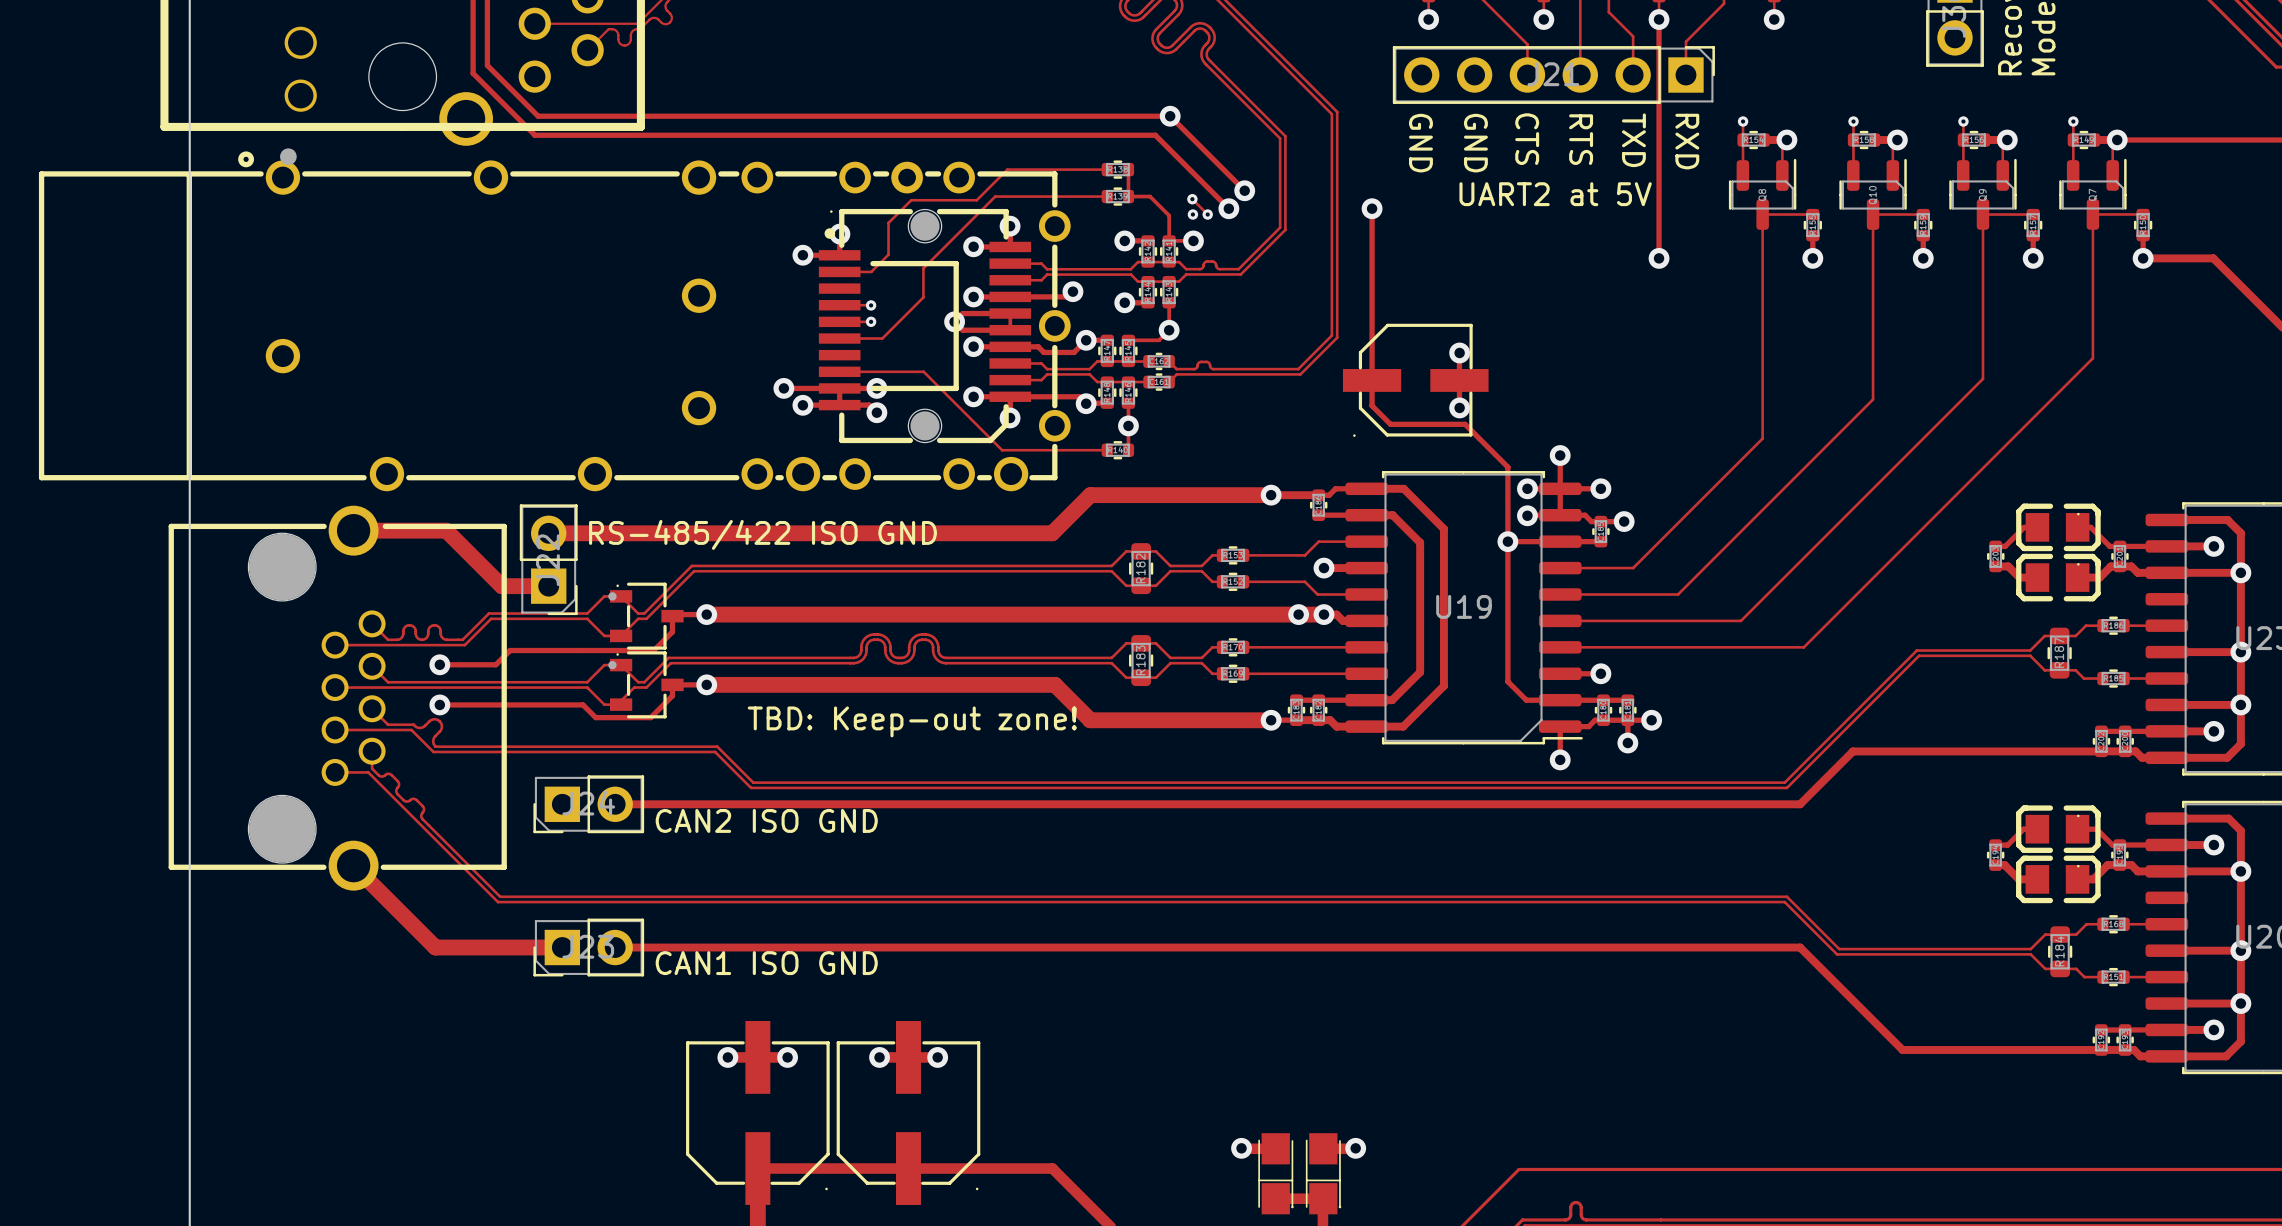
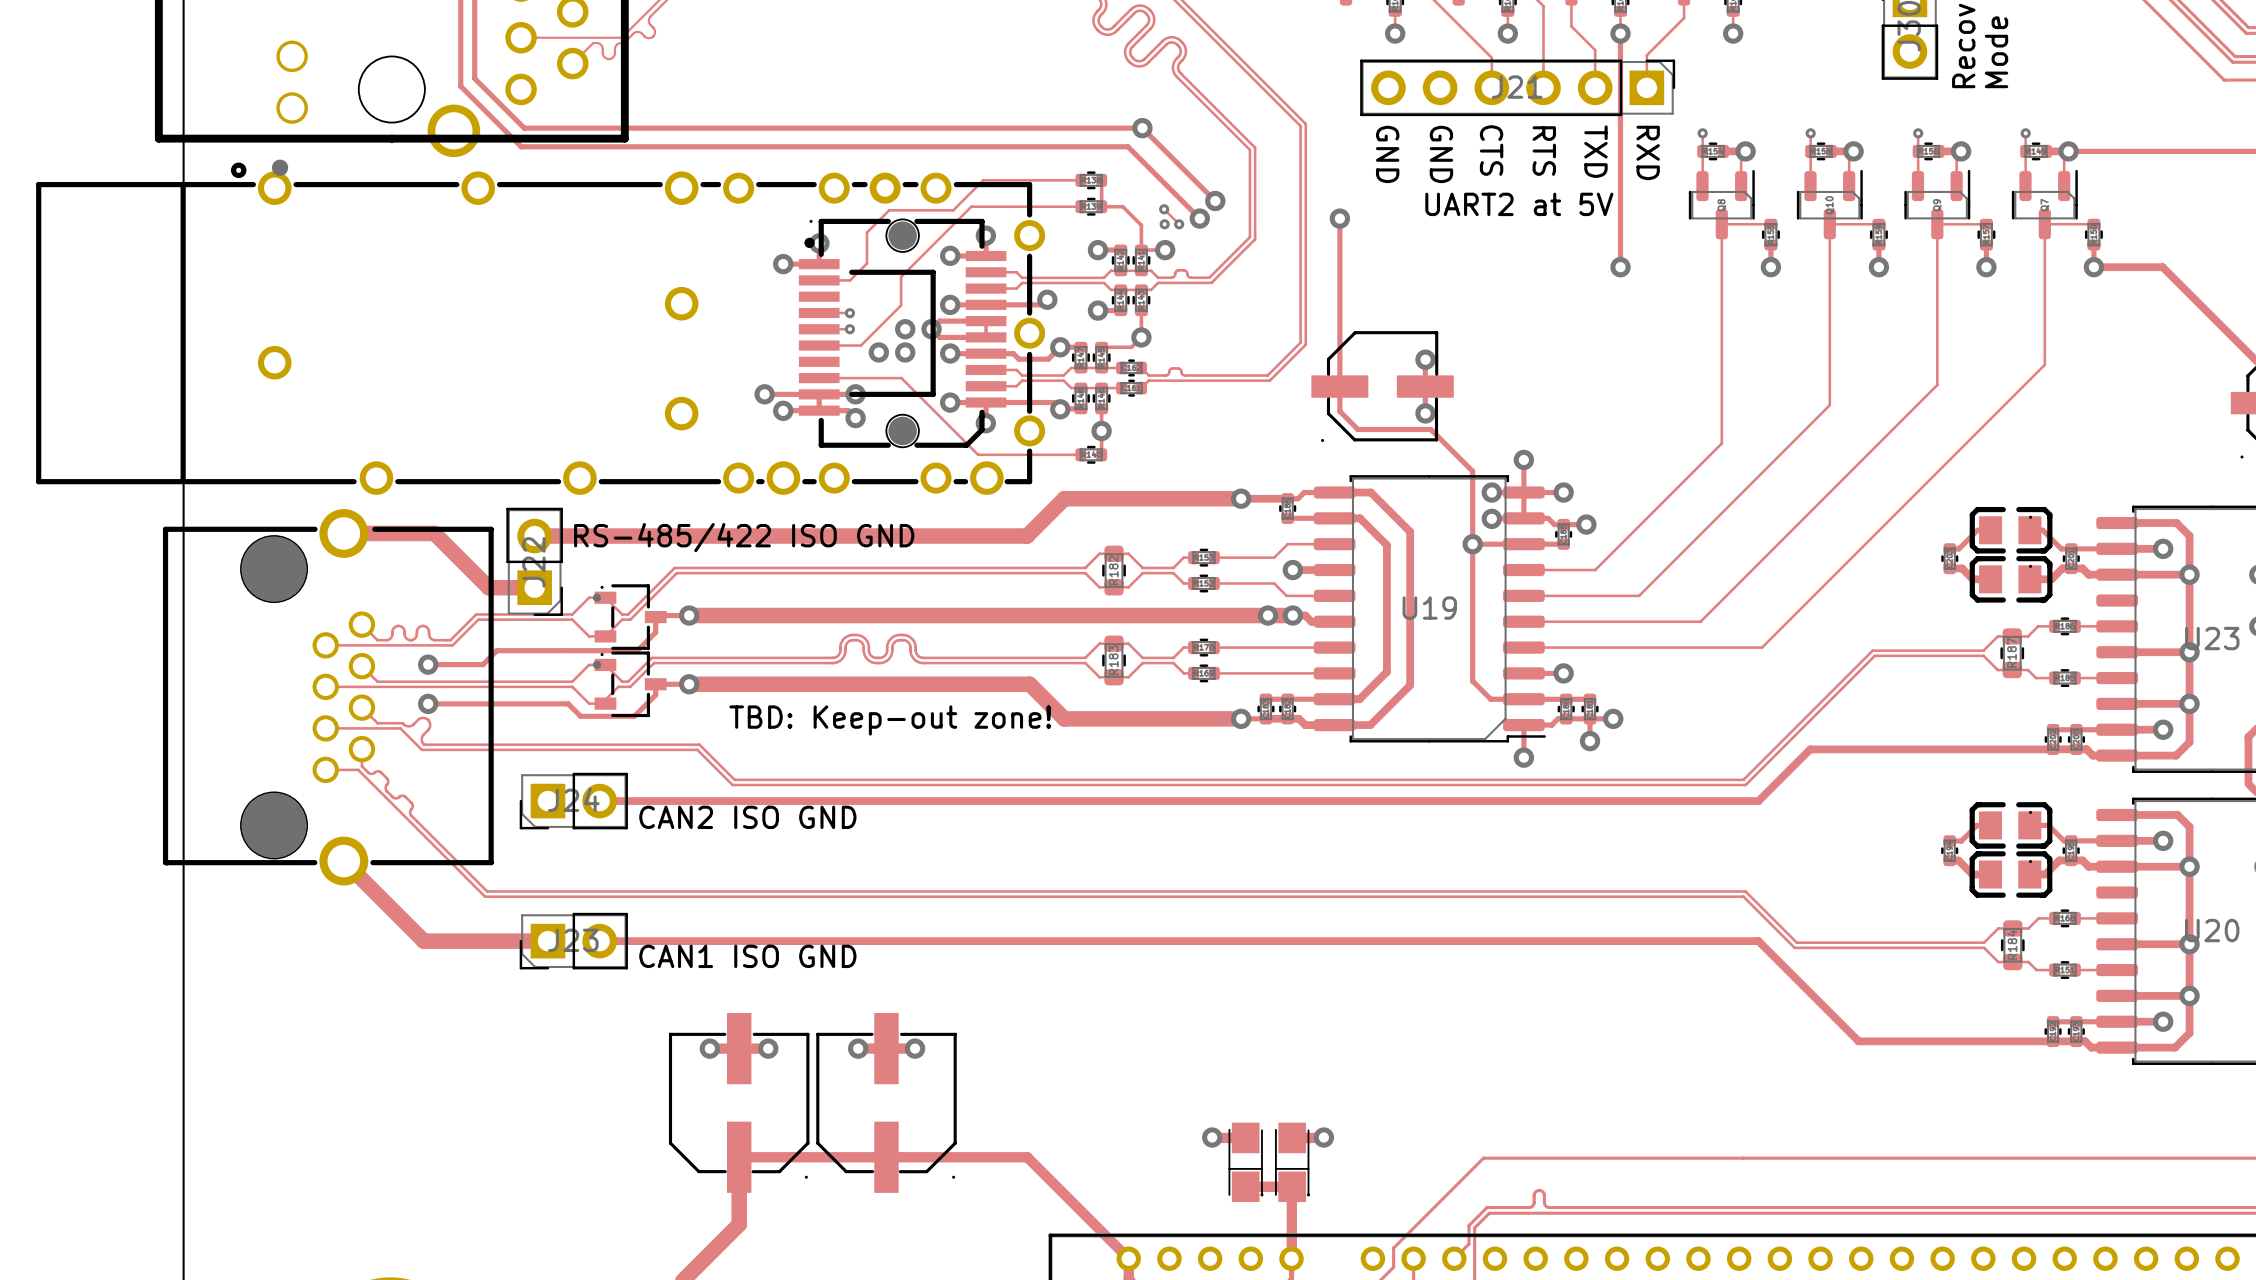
via: none -> (905, 329)
via: none -> (878, 352)
via: none -> (905, 352)

